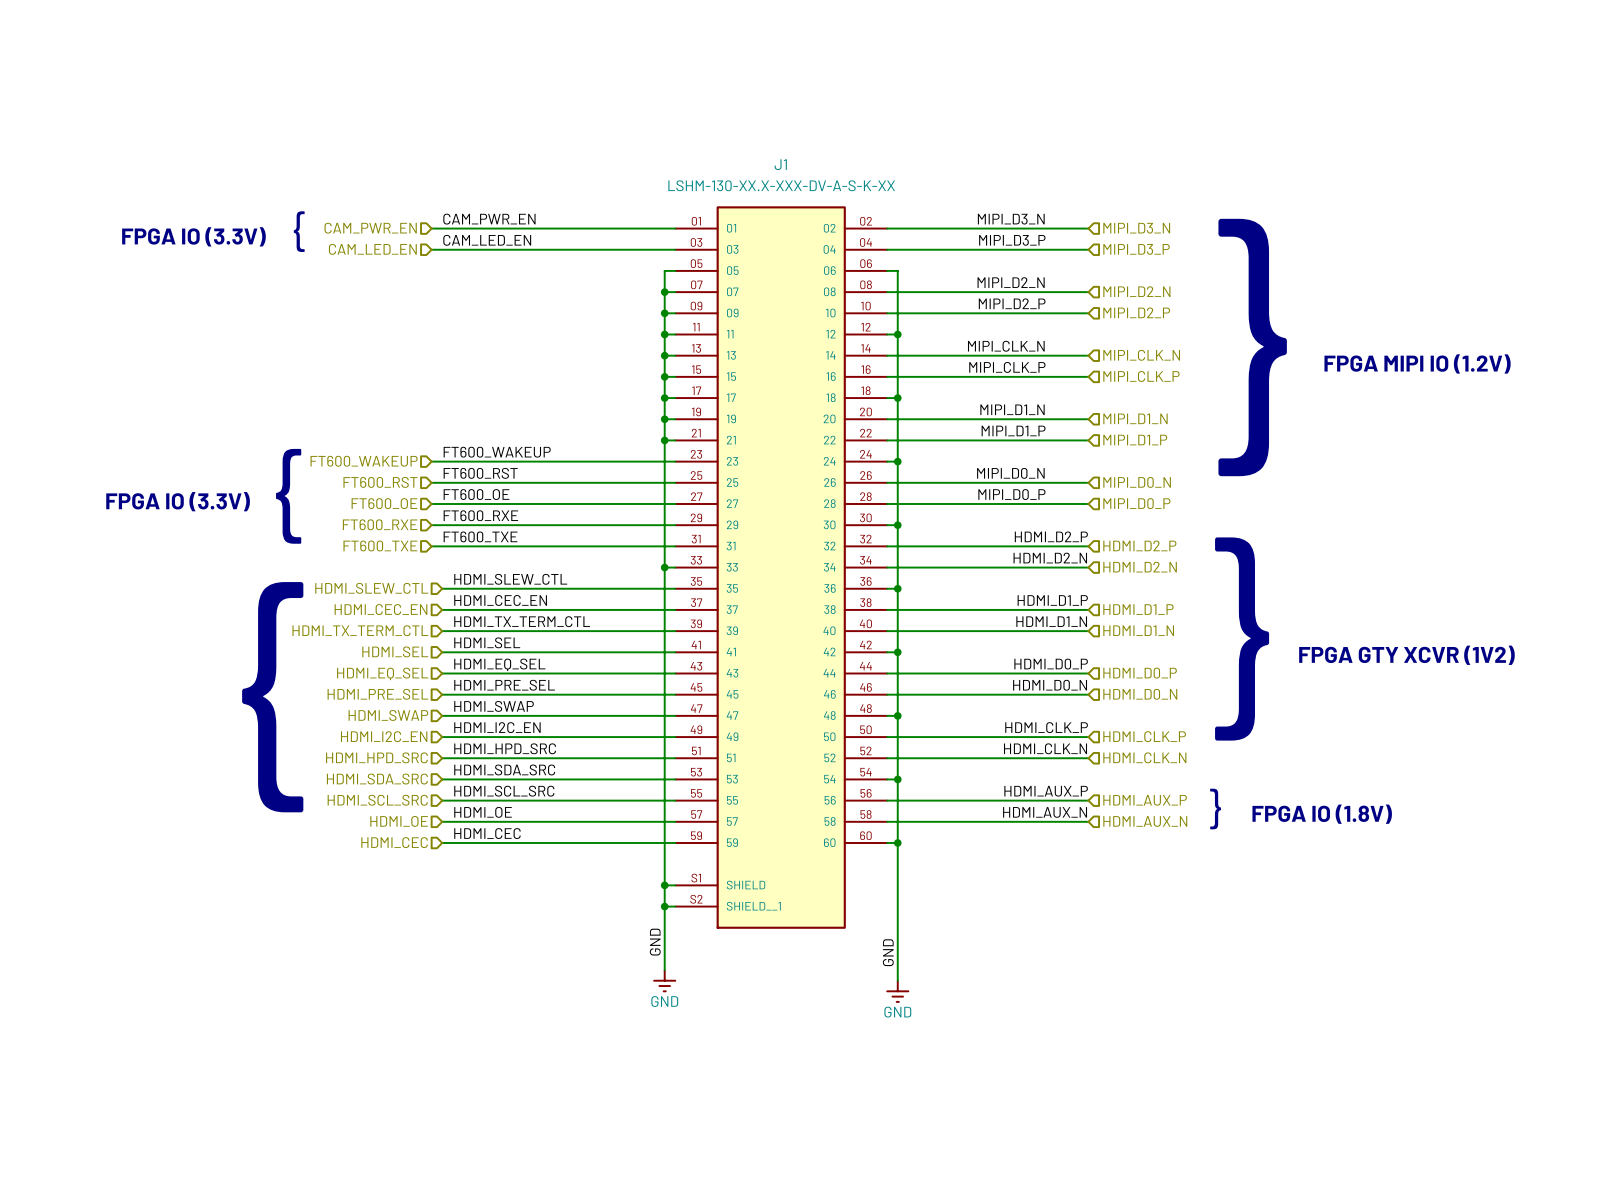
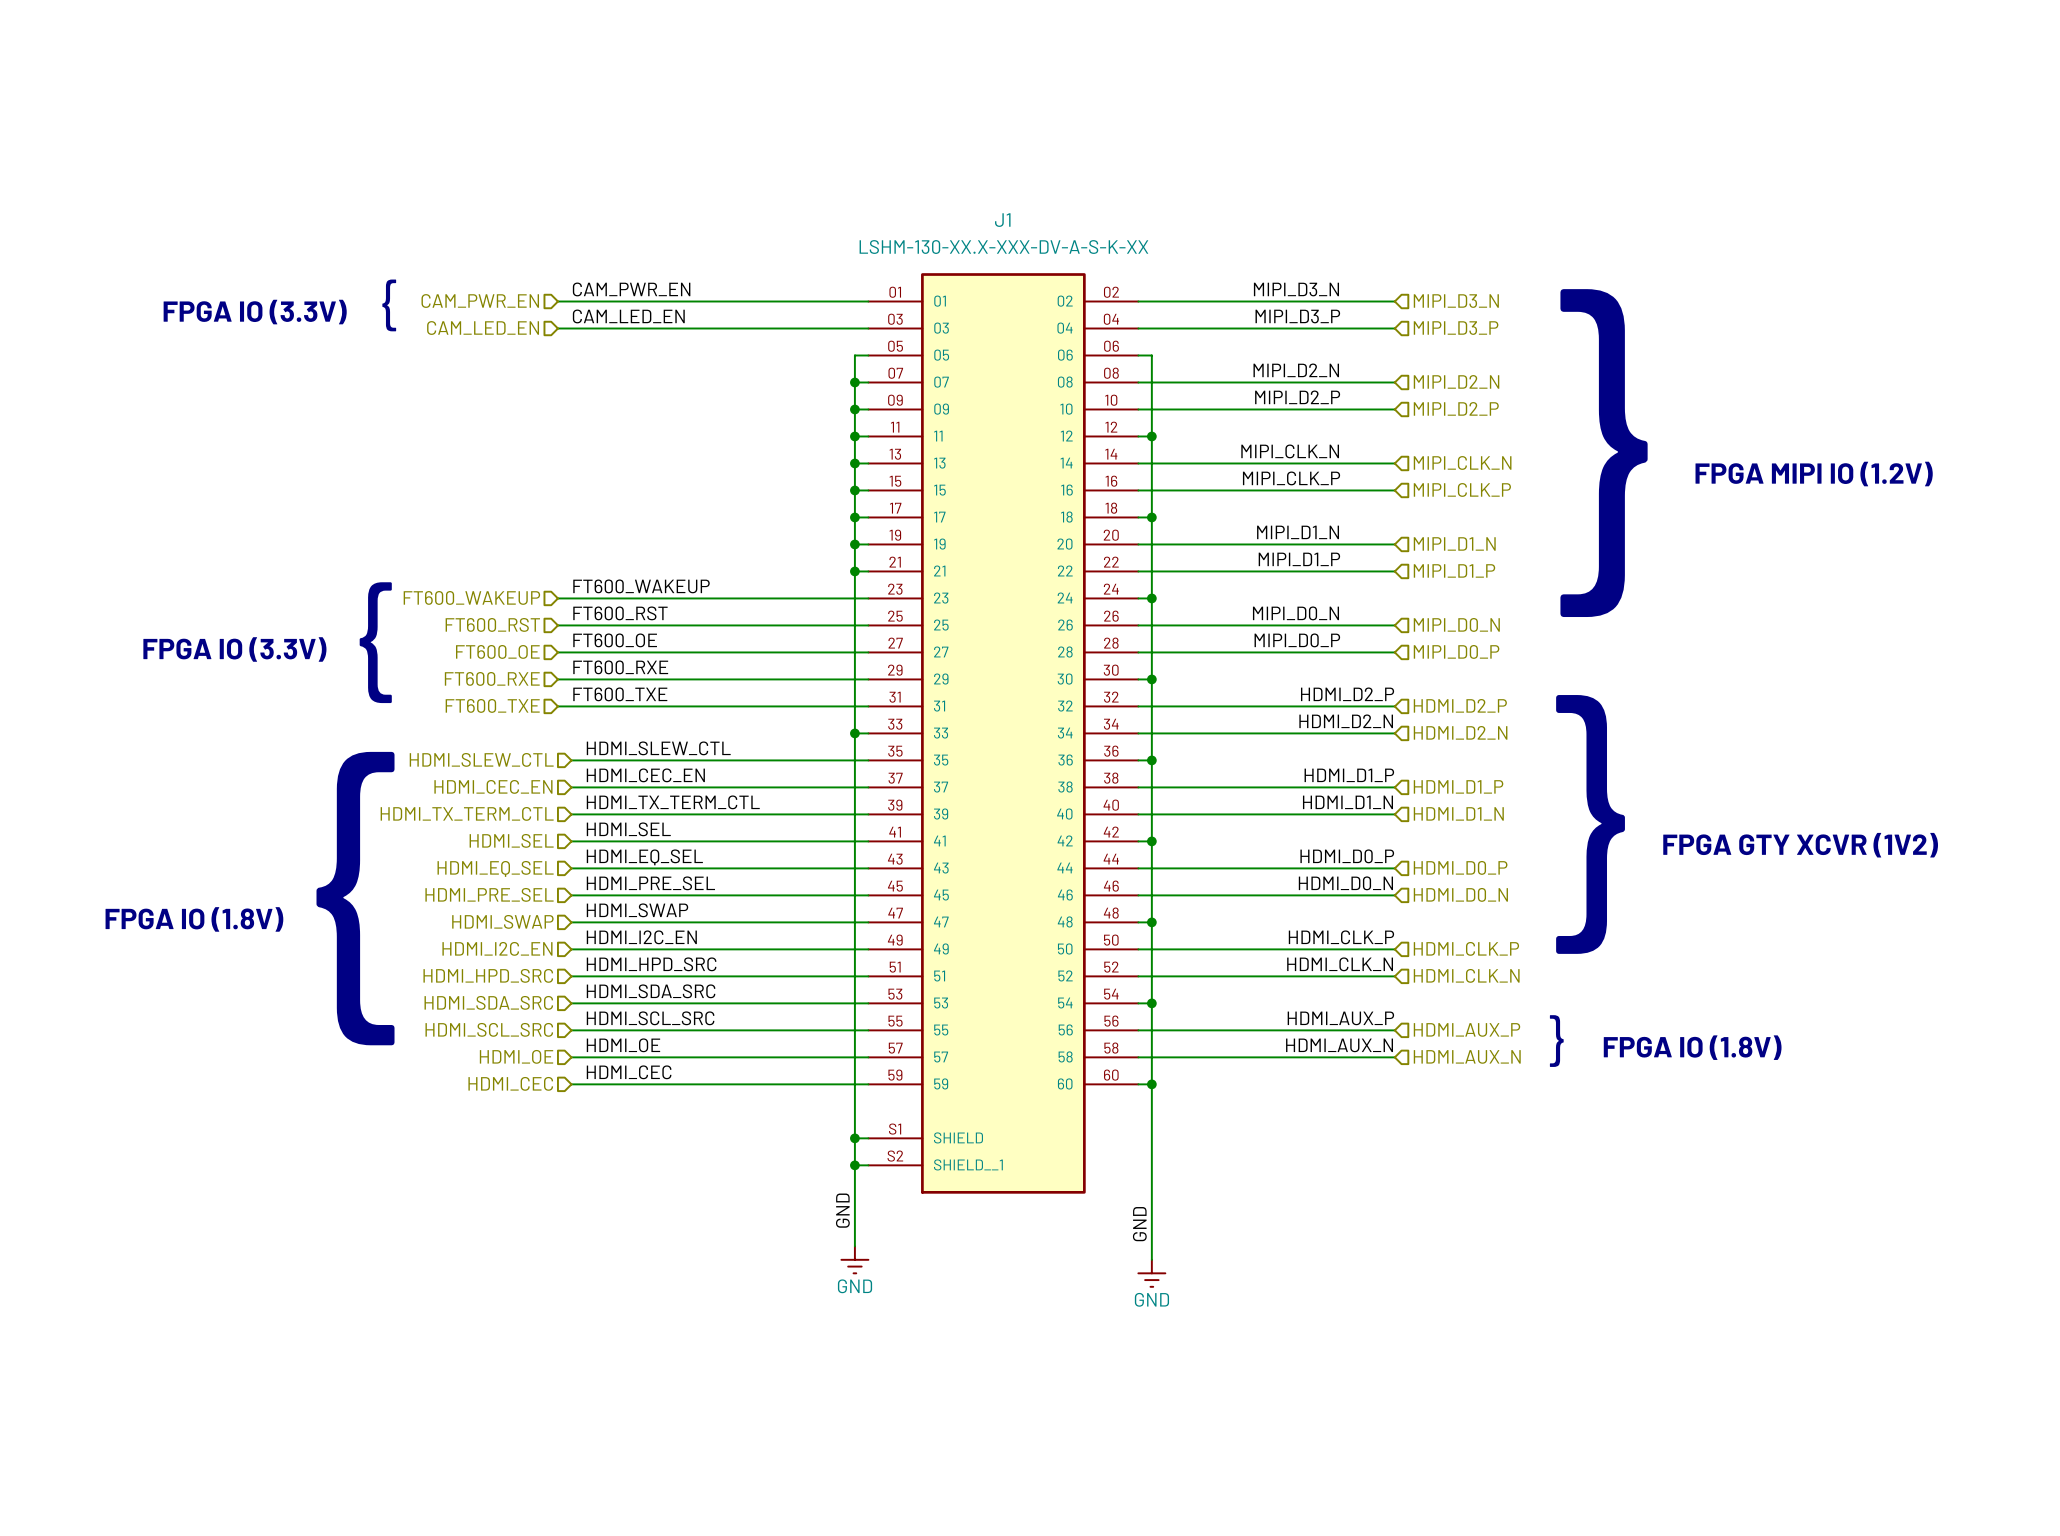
text: none -> FPGA IO (1.8V) (194, 919)

